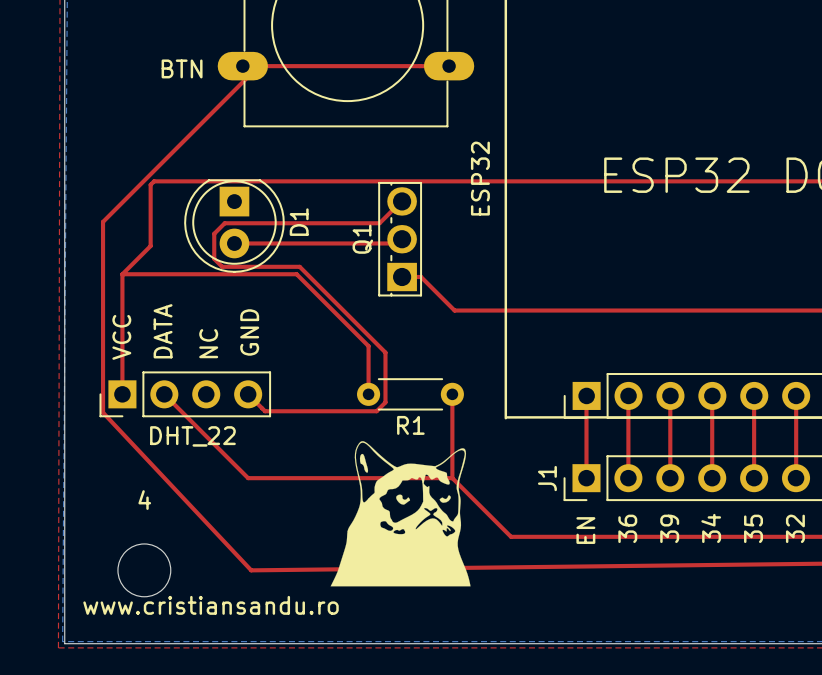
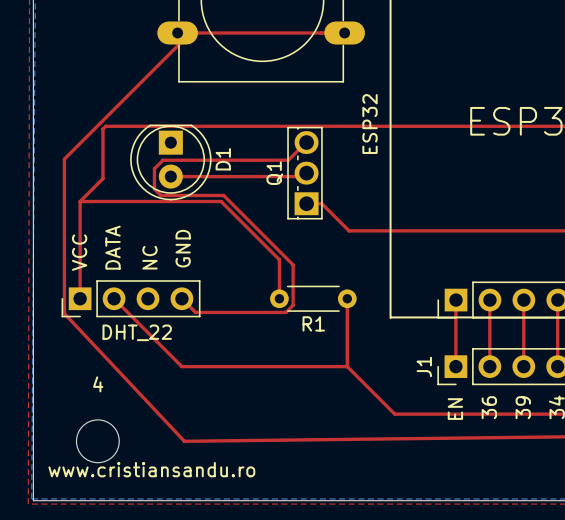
text: BTN (182, 68) -> none
drawing: [330, 441, 471, 587] -> none

